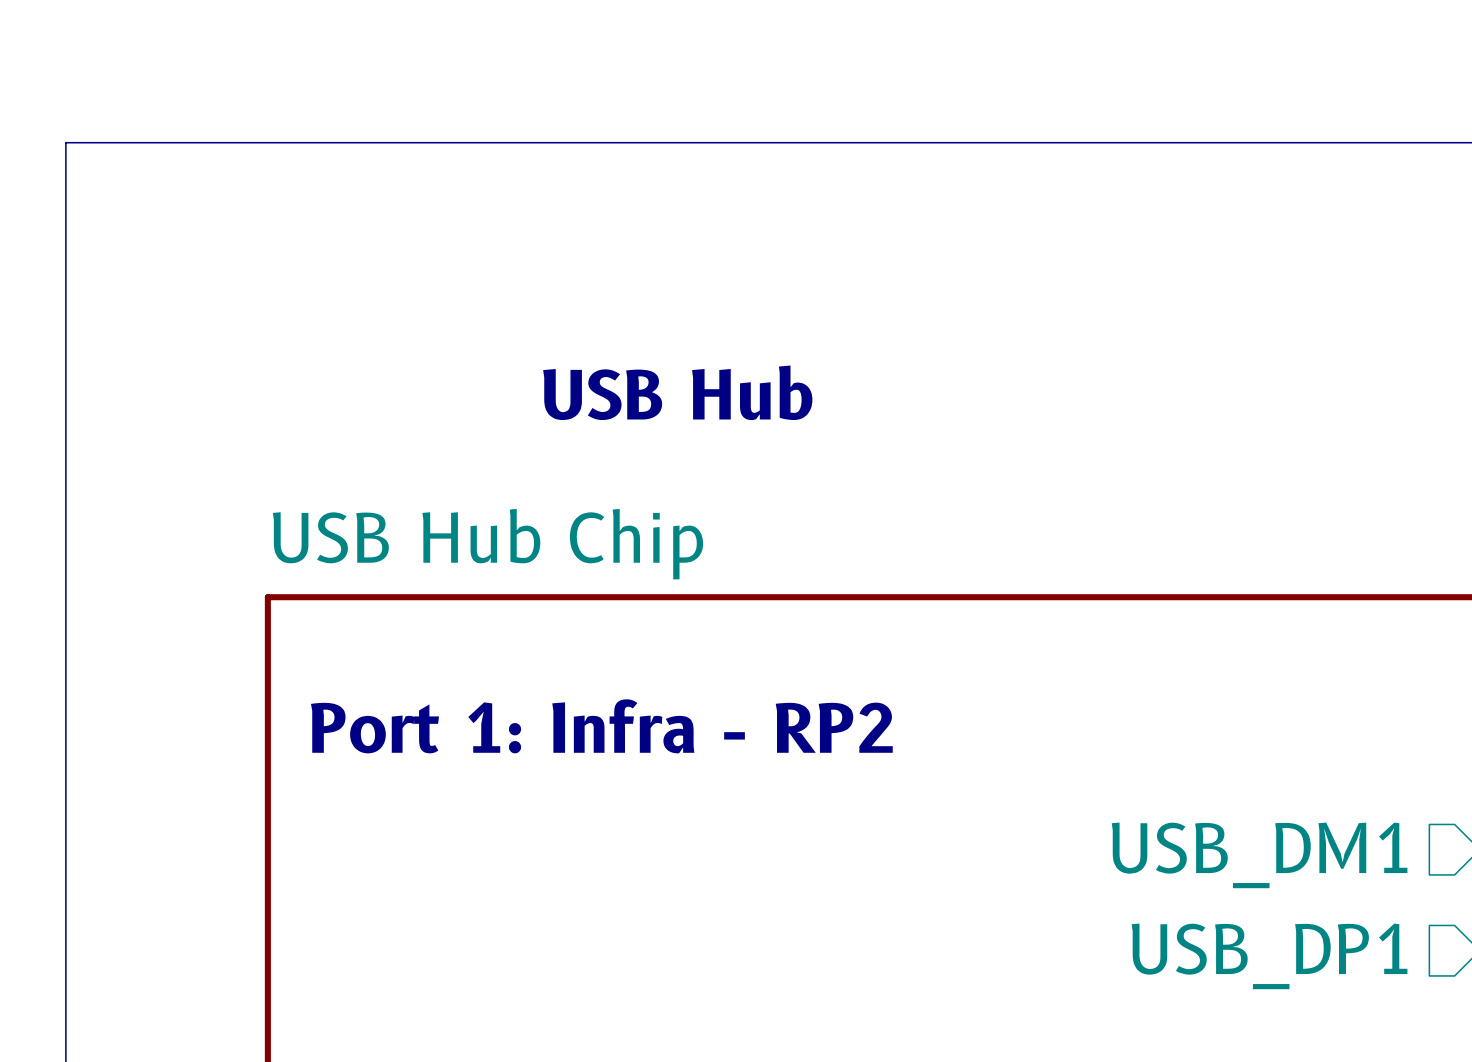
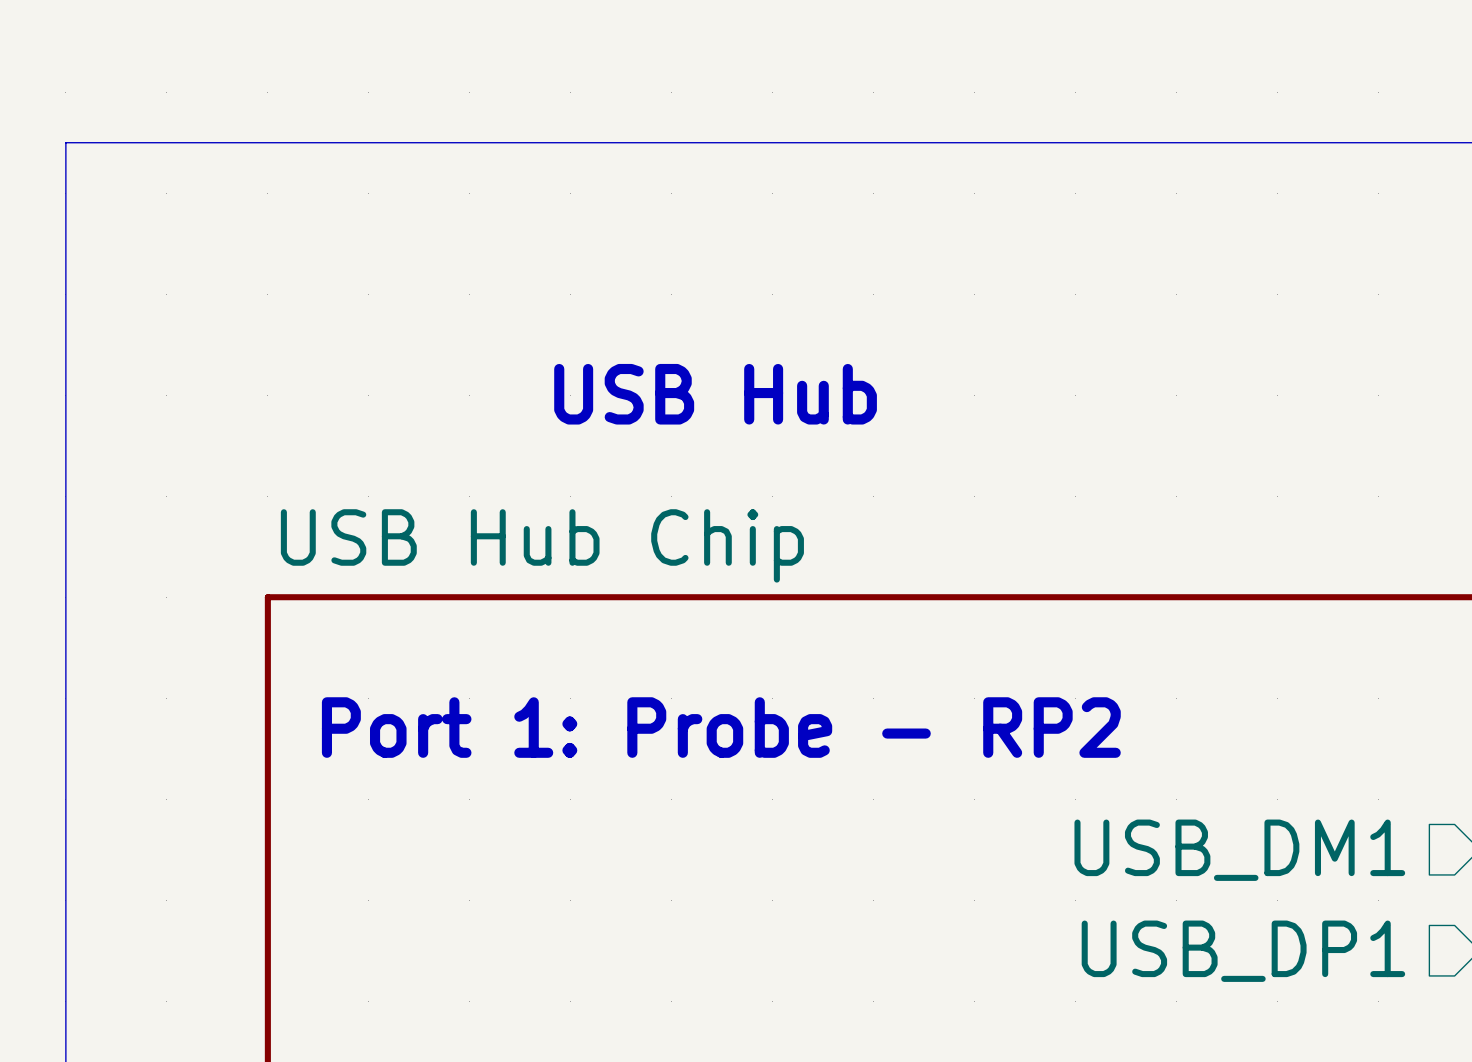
text: Port 1: Infra - RP2 (601, 726) -> Port 1: Probe - RP2 (721, 727)

